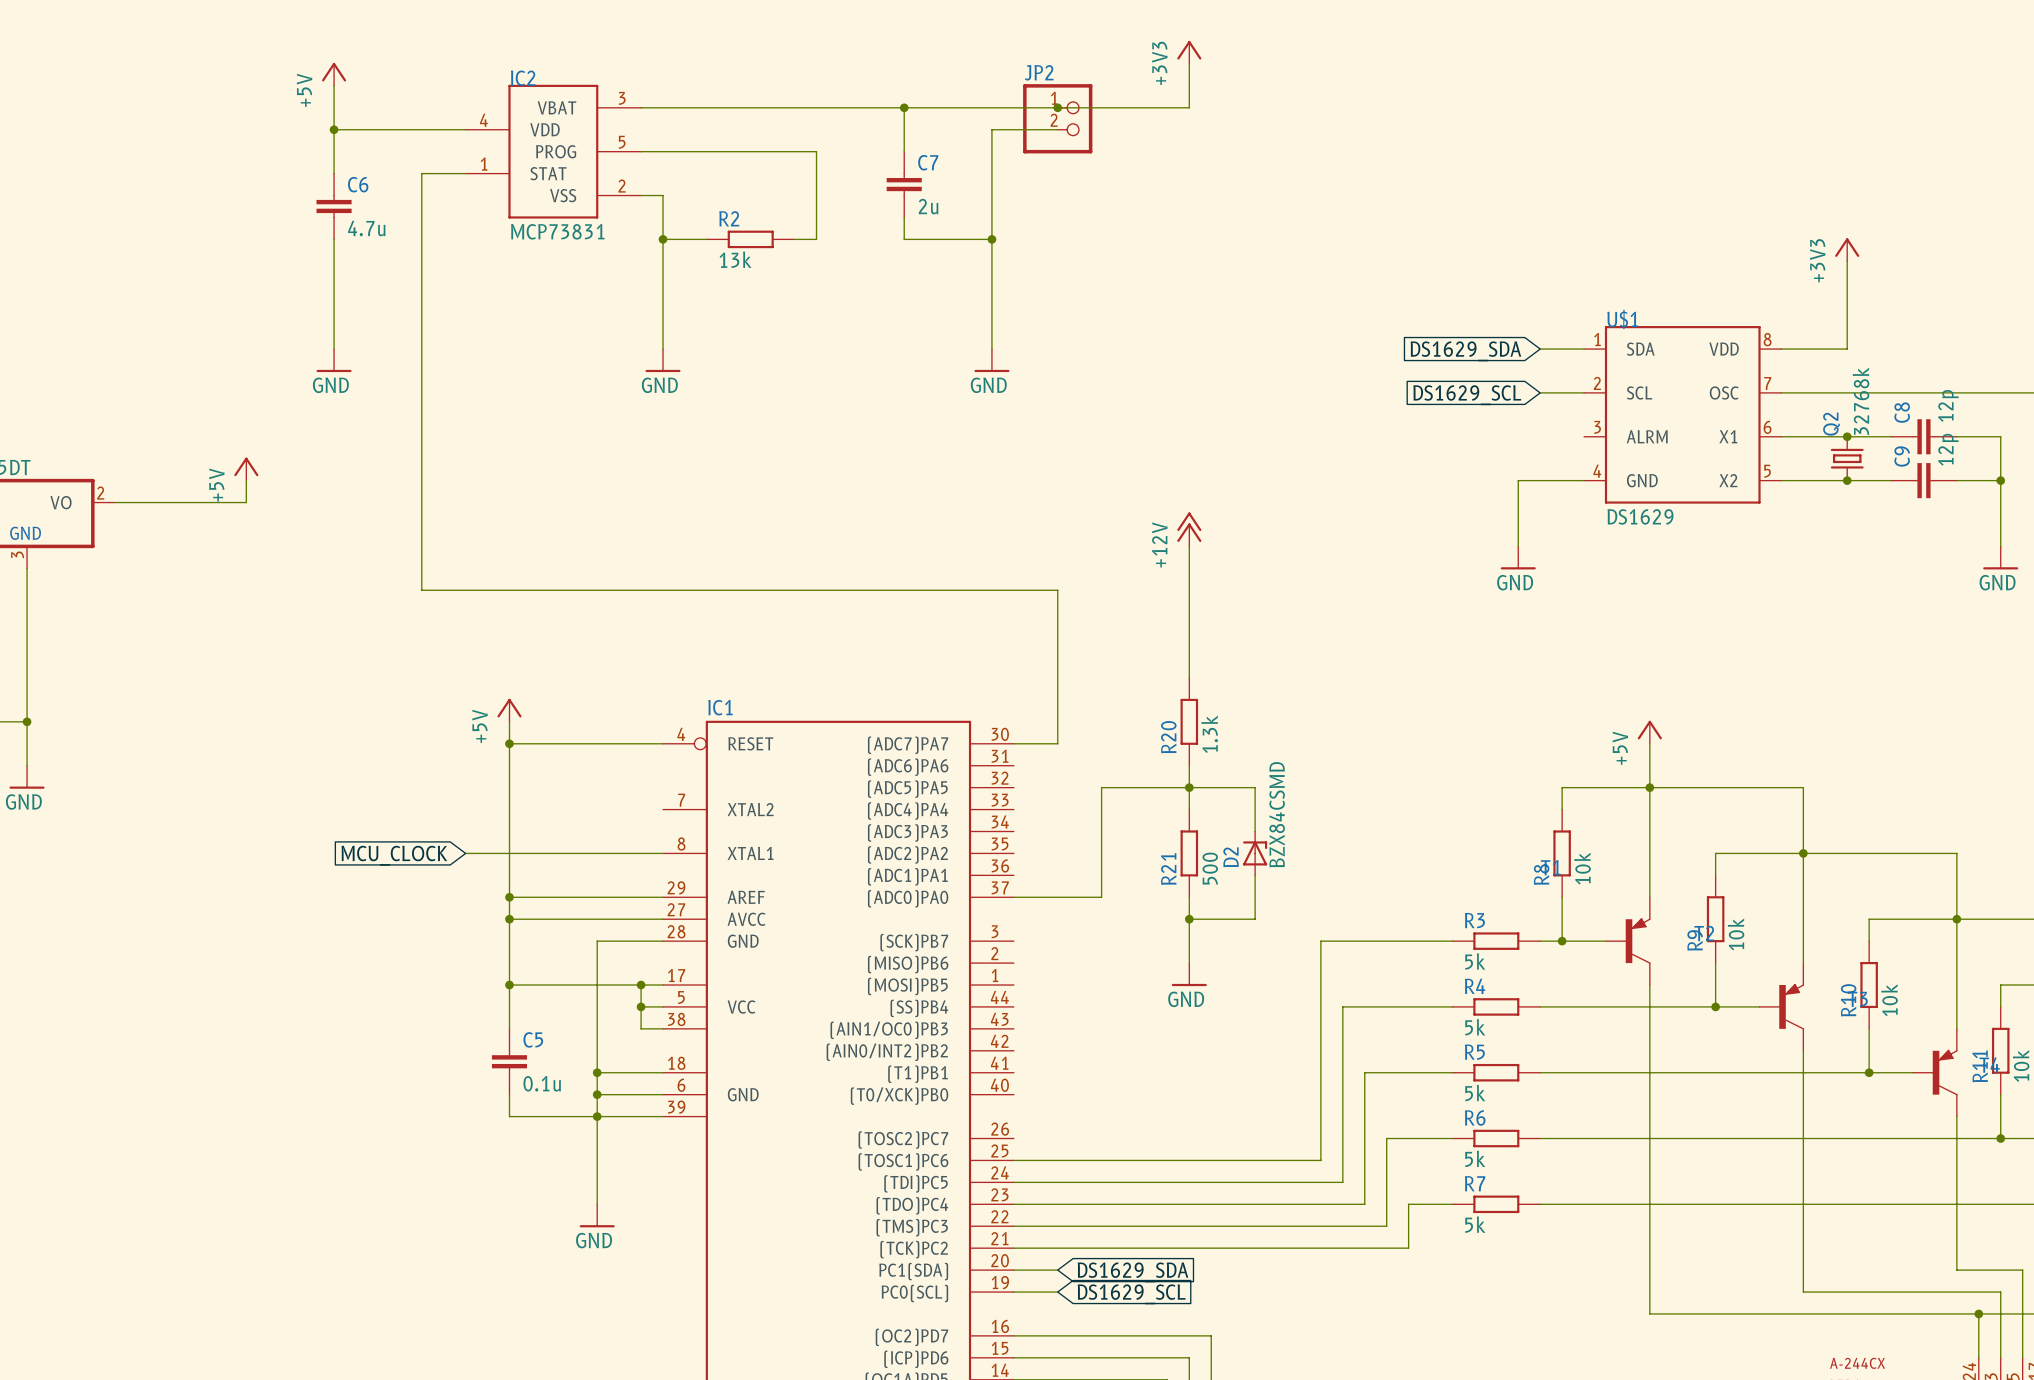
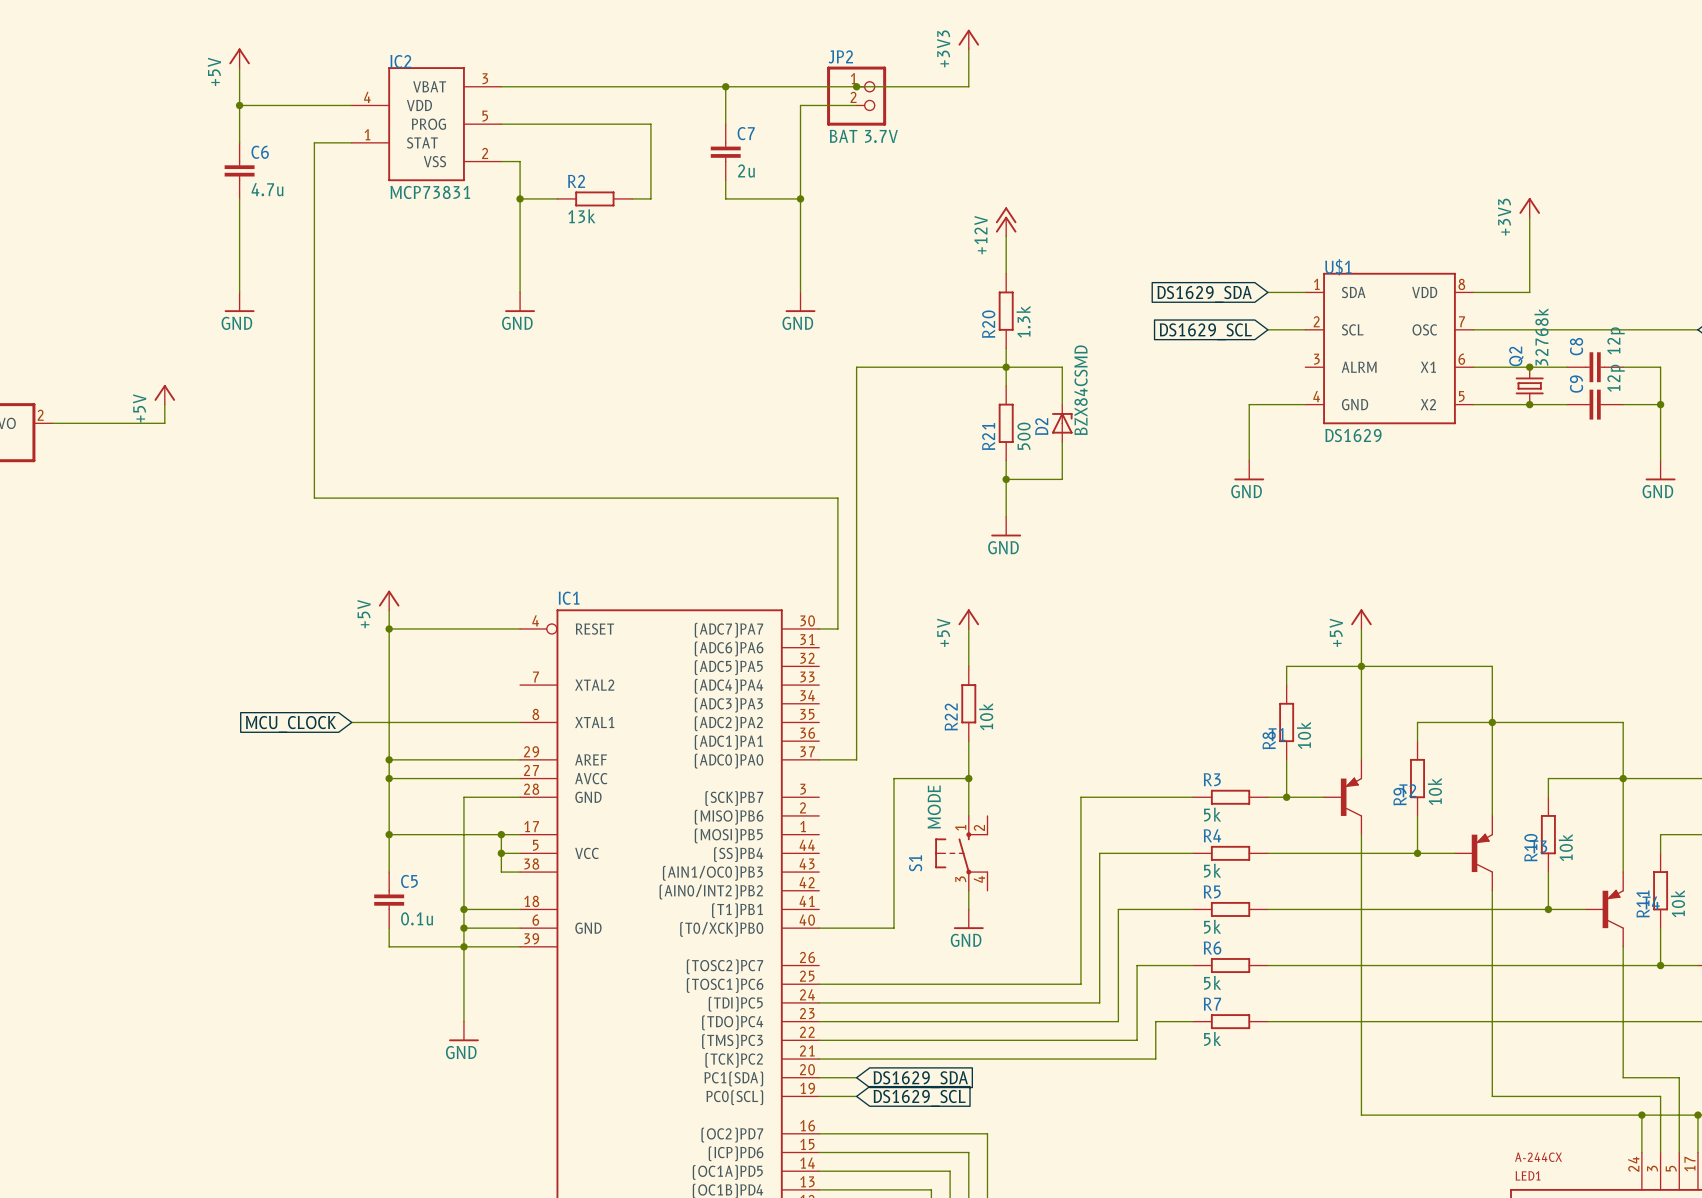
JP2 value: none -> BAT 3.7V (863, 136)
power symbol: none -> +12V (1006, 221)
wire: none -> (1006, 236) (1006, 273)
wire: none -> (1006, 348) (1006, 385)
junction: none -> (1006, 367)
wire: none -> (1062, 404) (1062, 367) (856, 367) (856, 498)
wire: none -> (1062, 442) (1062, 479) (1006, 479)
power symbol: +12V (1189, 529) -> none
wire: (1189, 546) (1189, 677) -> none
wire: none -> (1006, 460) (1006, 516)
junction: none -> (1006, 479)
wire: (1035, 590) (1057, 590) -> (837, 498) (837, 628)
power symbol: none -> GND (1006, 526)
R20 position: (1189, 721) -> (1006, 311)
power symbol: none -> +5V (968, 619)
wire: (1035, 743) (1057, 743) -> (856, 759) (856, 628)
junction: (1189, 787) -> none
R22: none -> 10k (968, 703)
wire: (1255, 831) (1255, 787) (1101, 787) (1101, 897) (1057, 897) -> none
R21 position: (1189, 853) -> (1006, 423)
D2 position: (1255, 853) -> (1062, 423)
wire: (1255, 875) (1255, 919) (1189, 919) -> (819, 928) (894, 928) (894, 778) (968, 778)
power symbol position: GND (1189, 974) -> GND (968, 919)
S1: none -> MODE (961, 853)
wire: none -> (968, 890) (968, 909)

